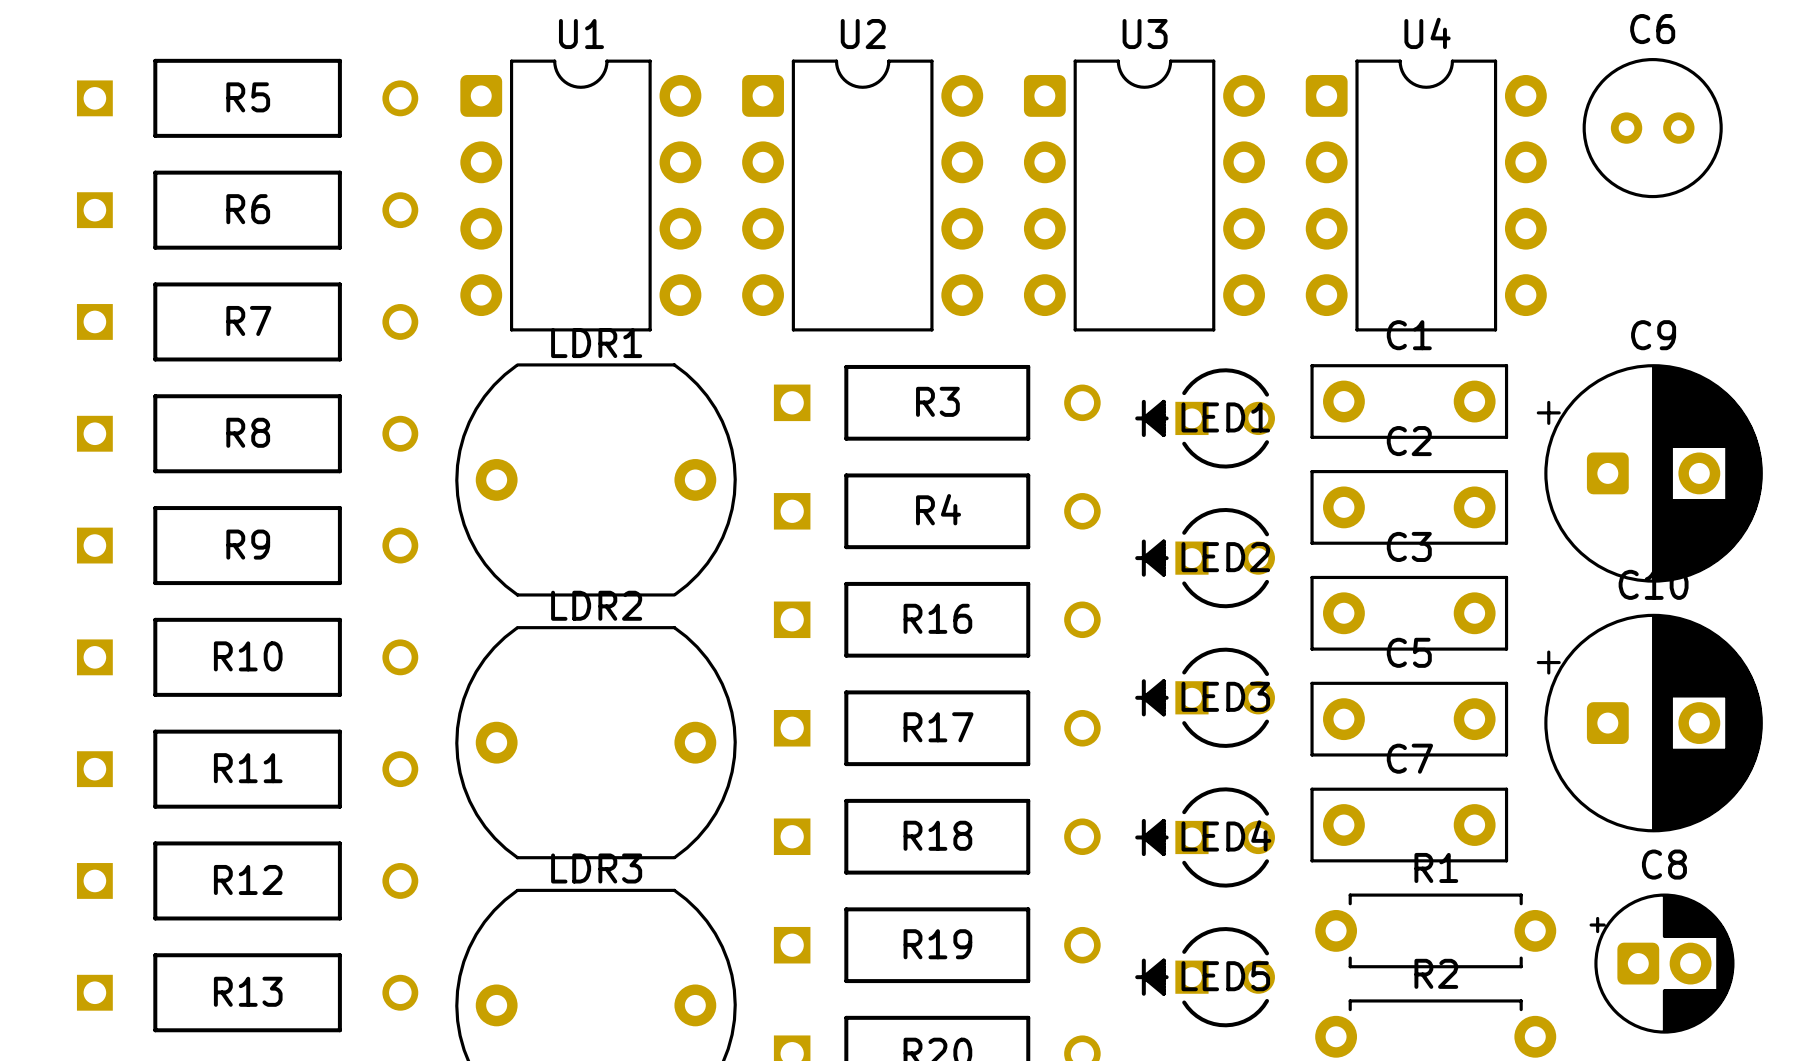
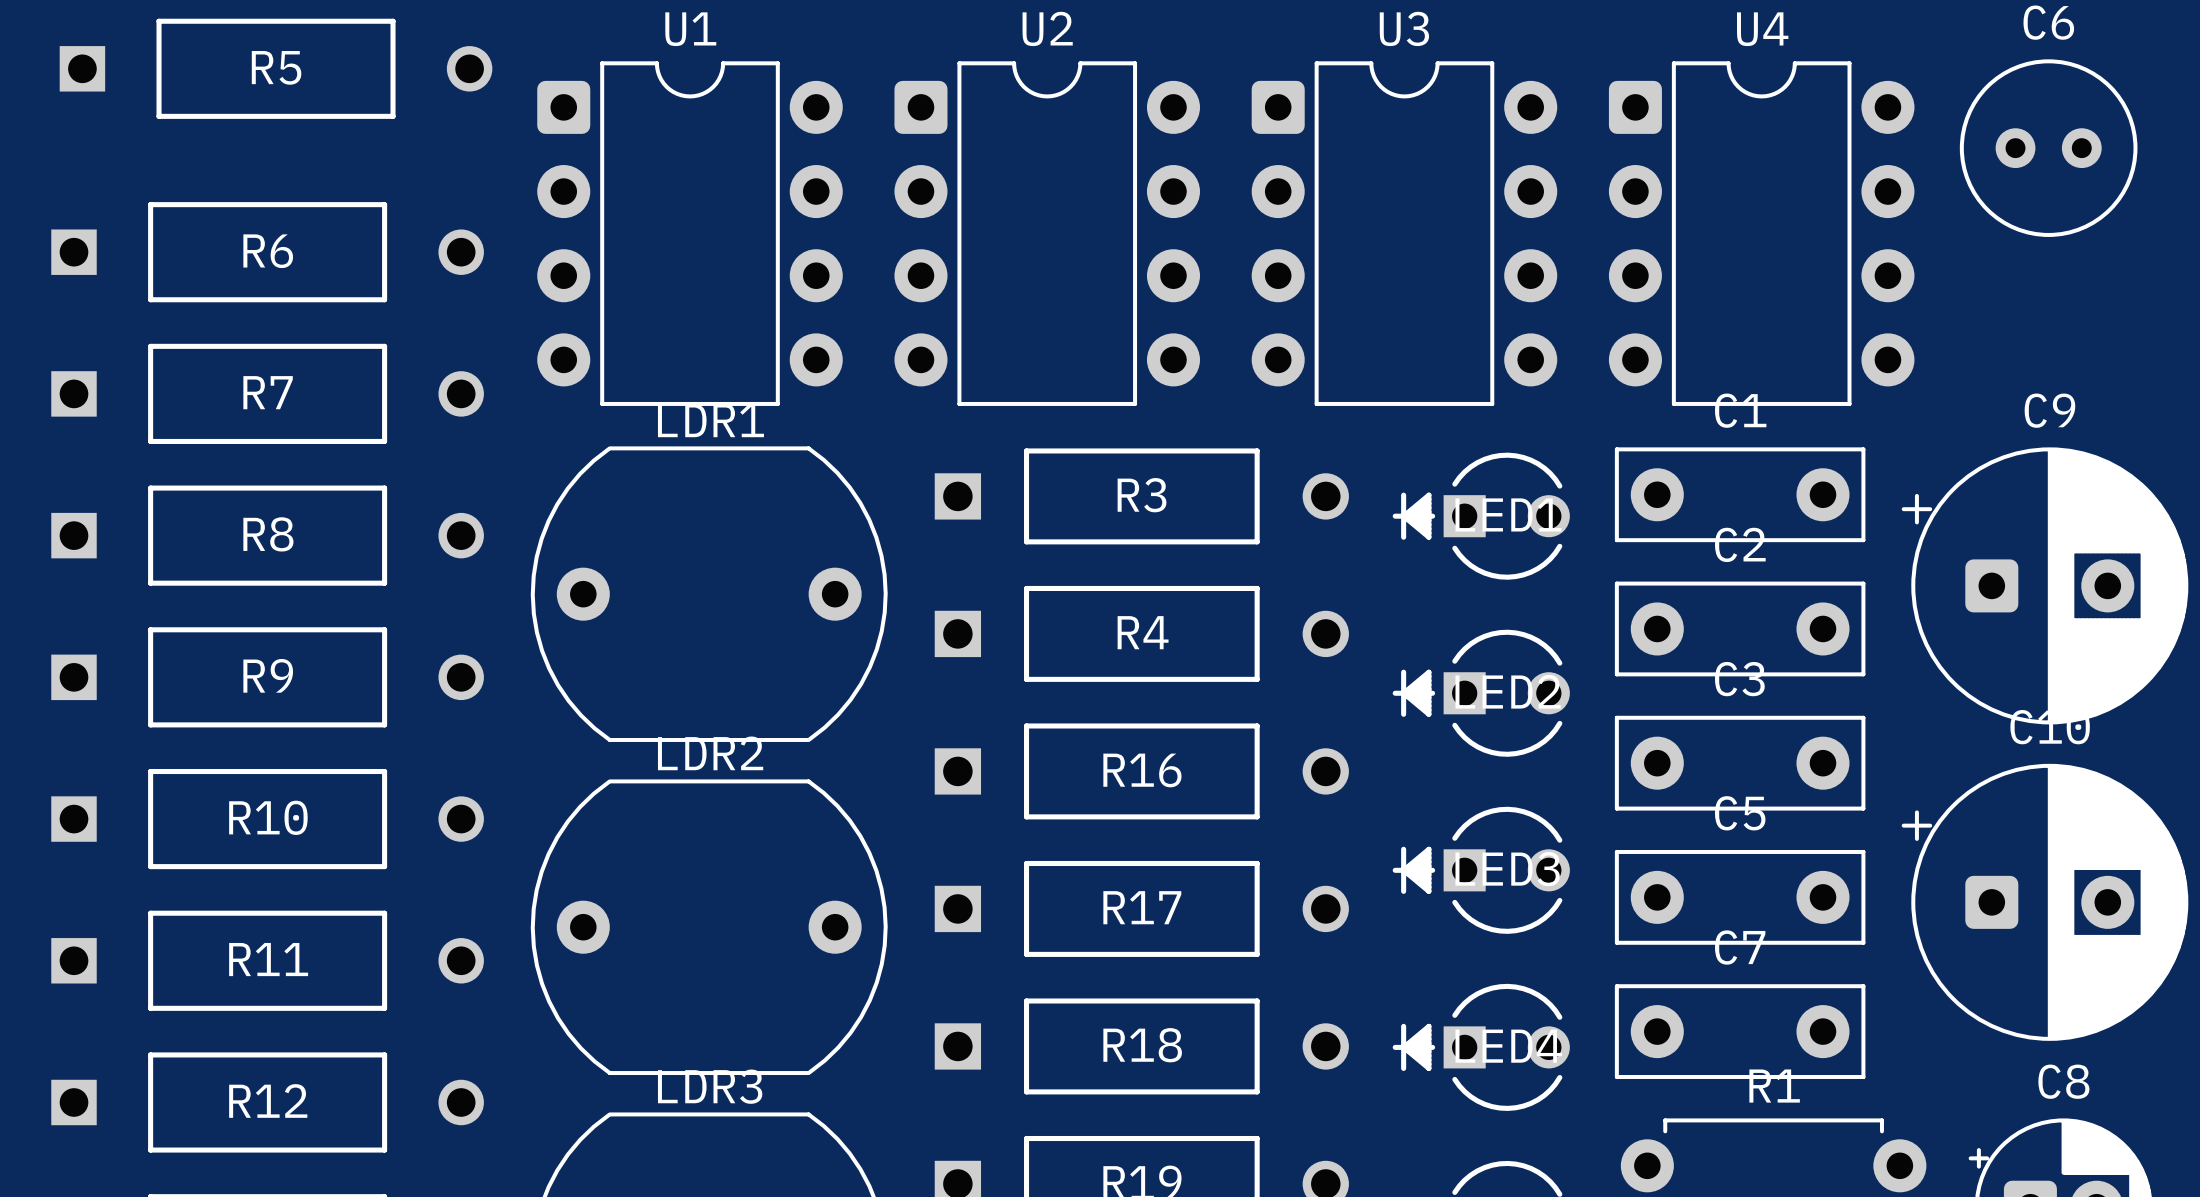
R5 position: (247, 98) -> (276, 68)

